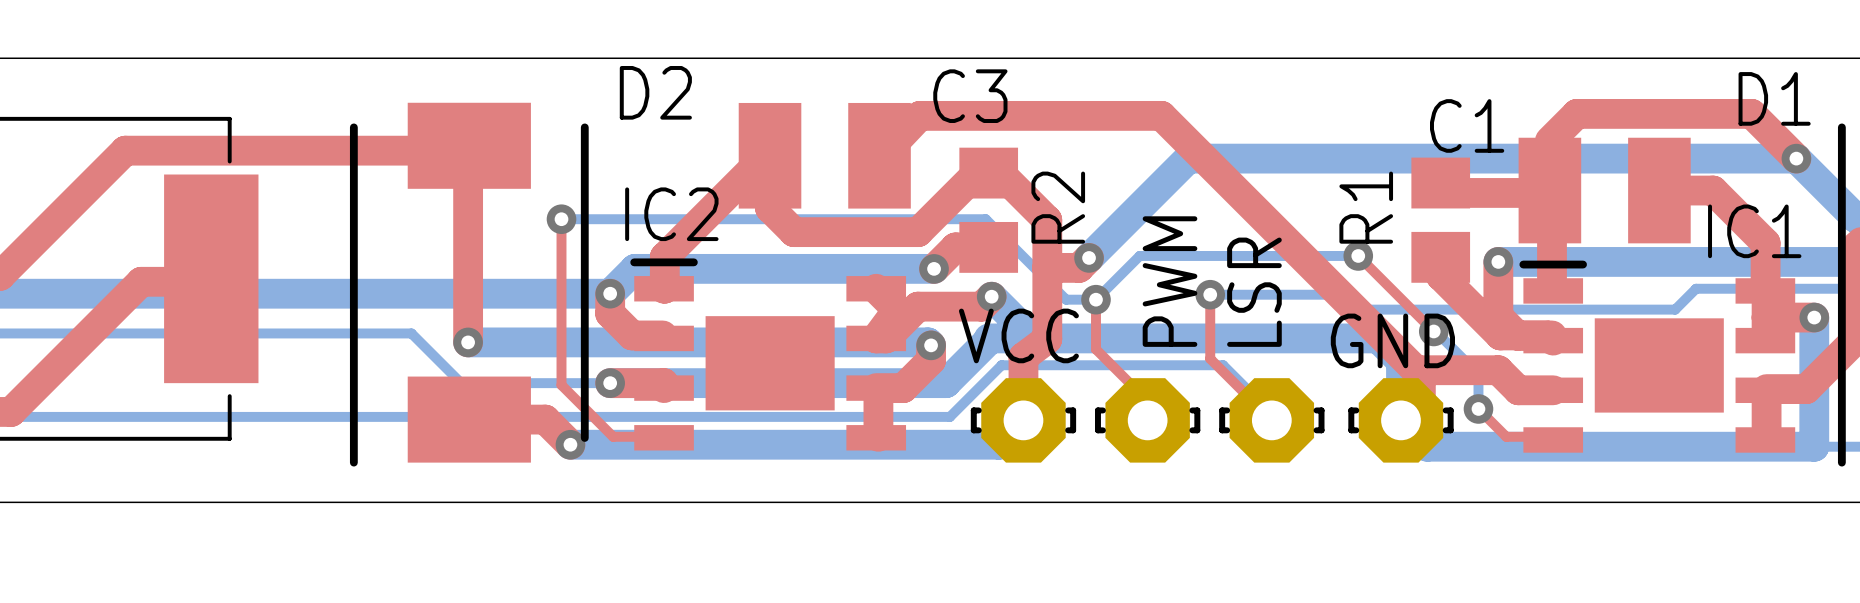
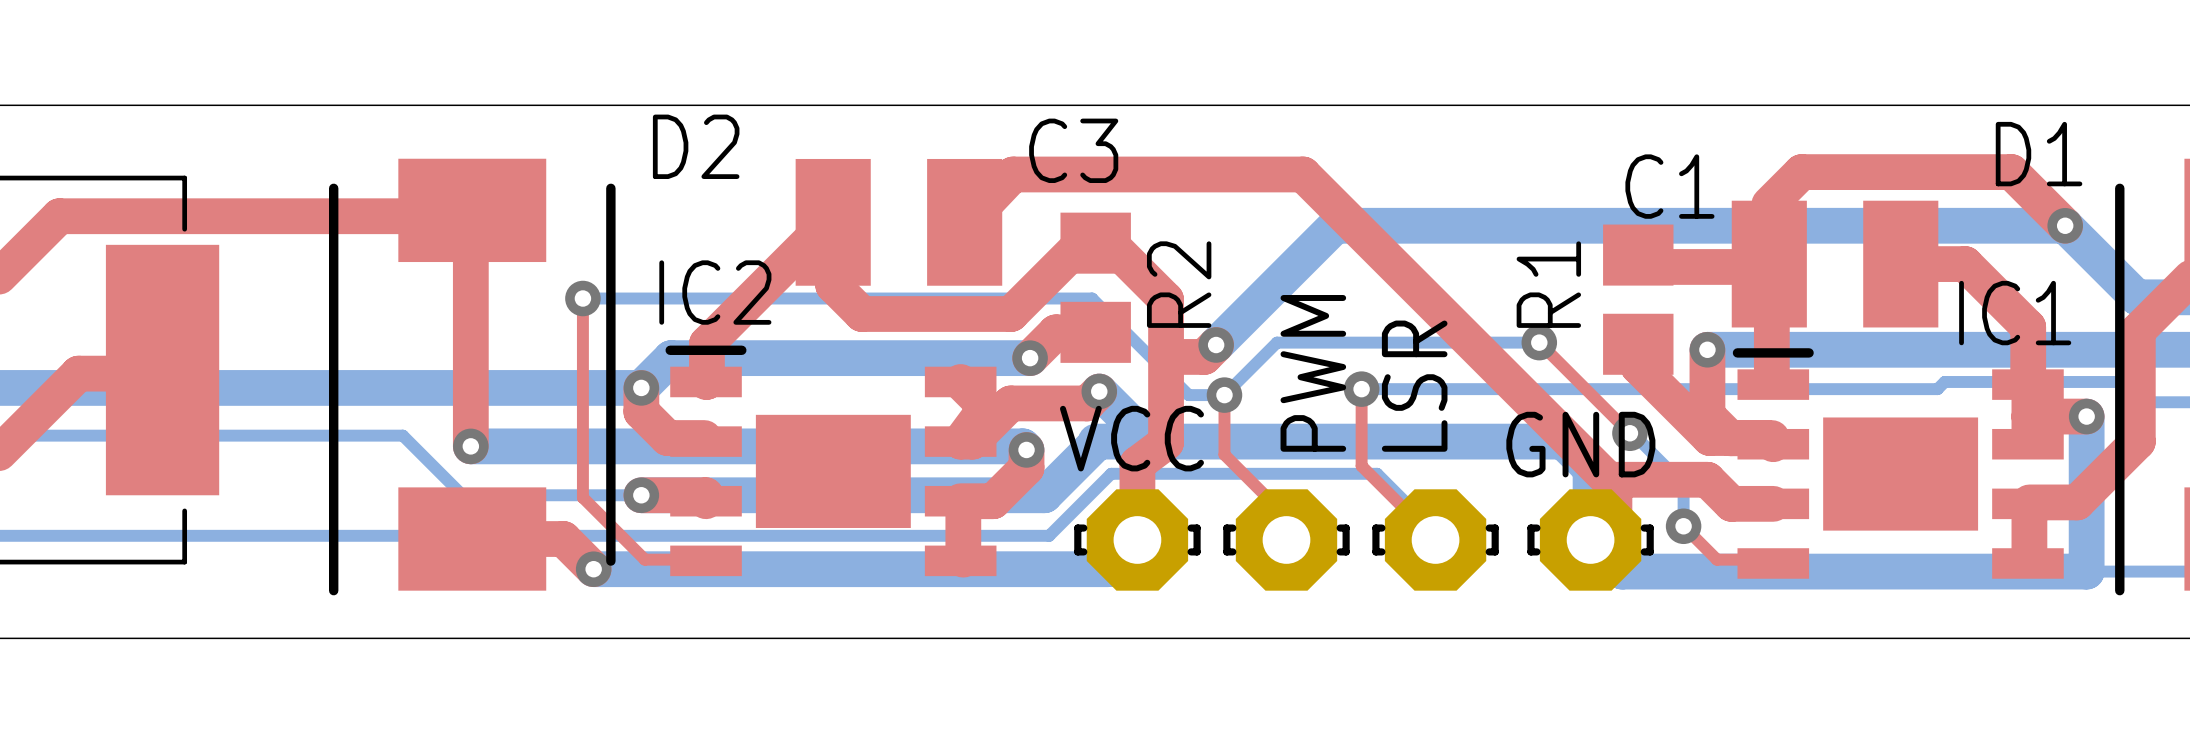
bottom track: (1344, 294) (1359, 309) (1675, 309) (1690, 294) -> (1522, 389) (1937, 389)

